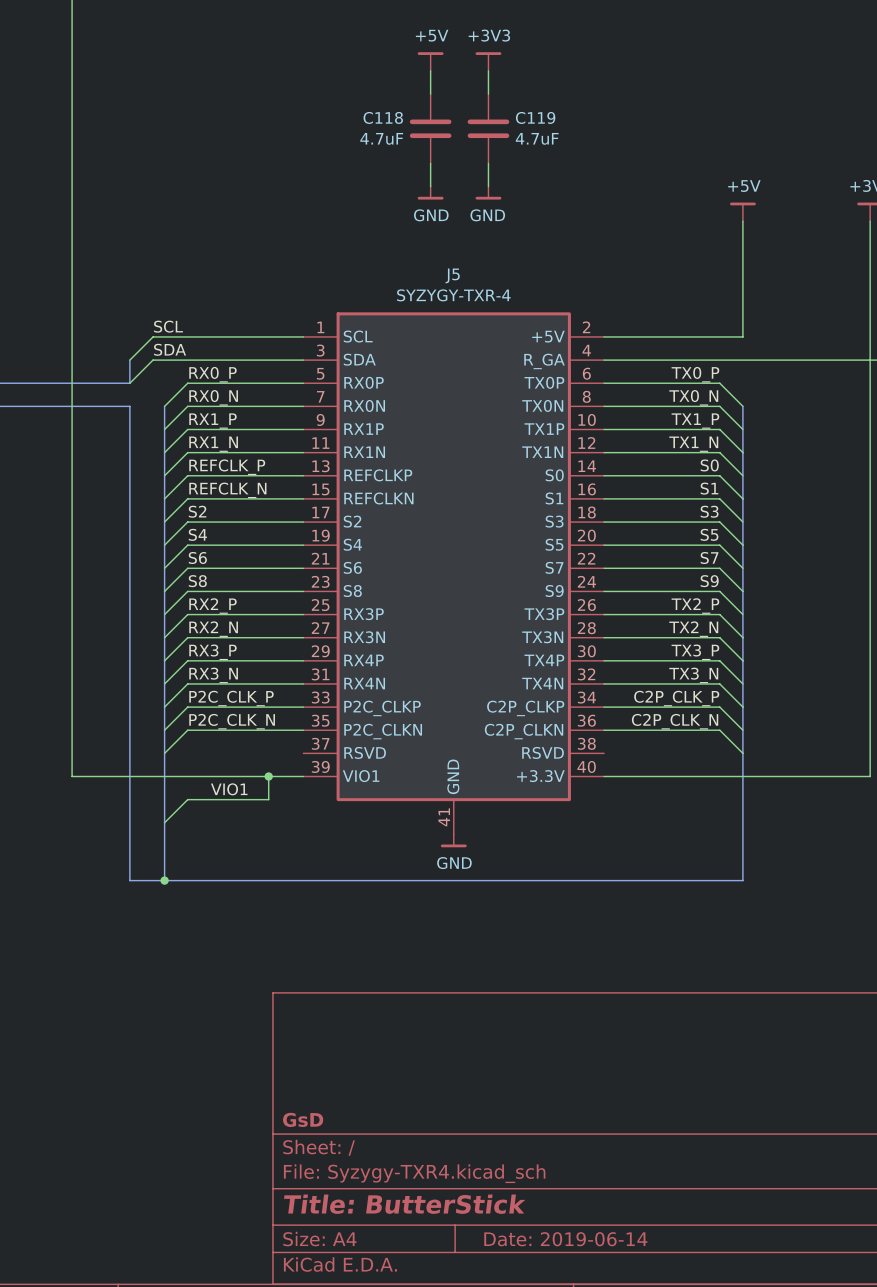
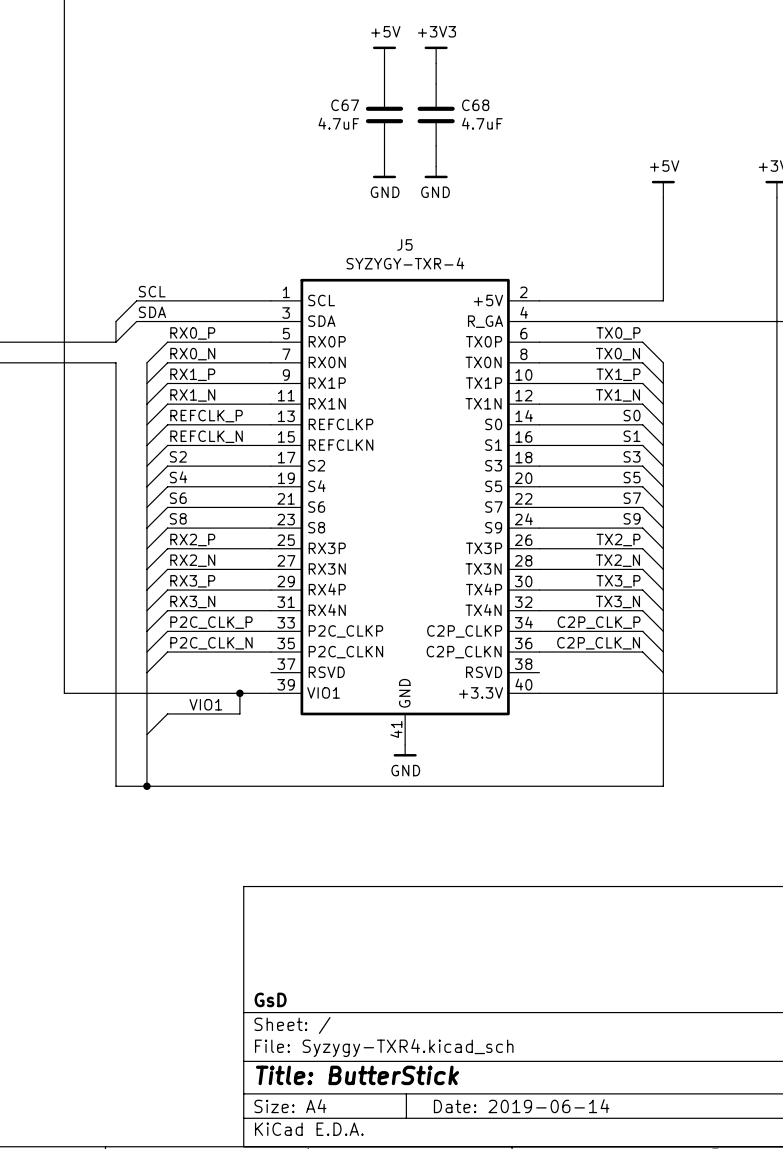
C118 name: C118 (383, 117) -> C67 (345, 105)
C119 name: C119 (535, 117) -> C68 (475, 105)

